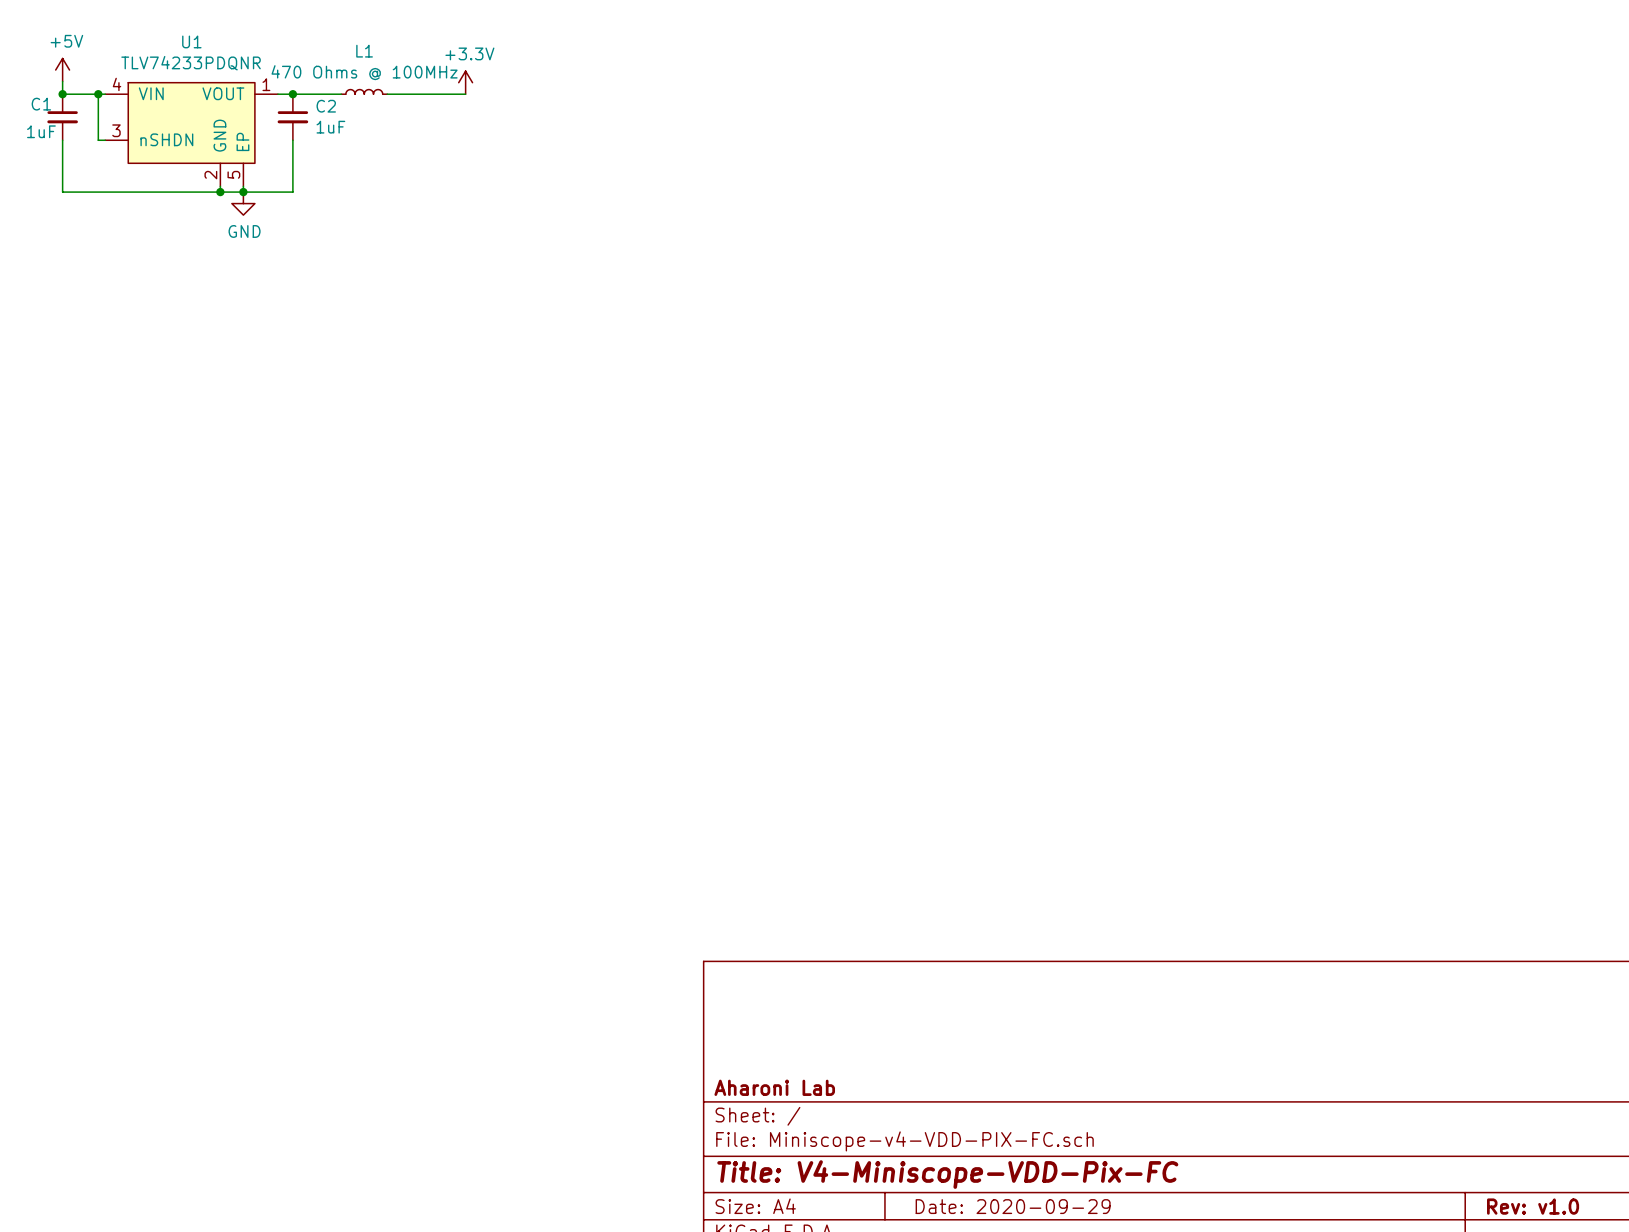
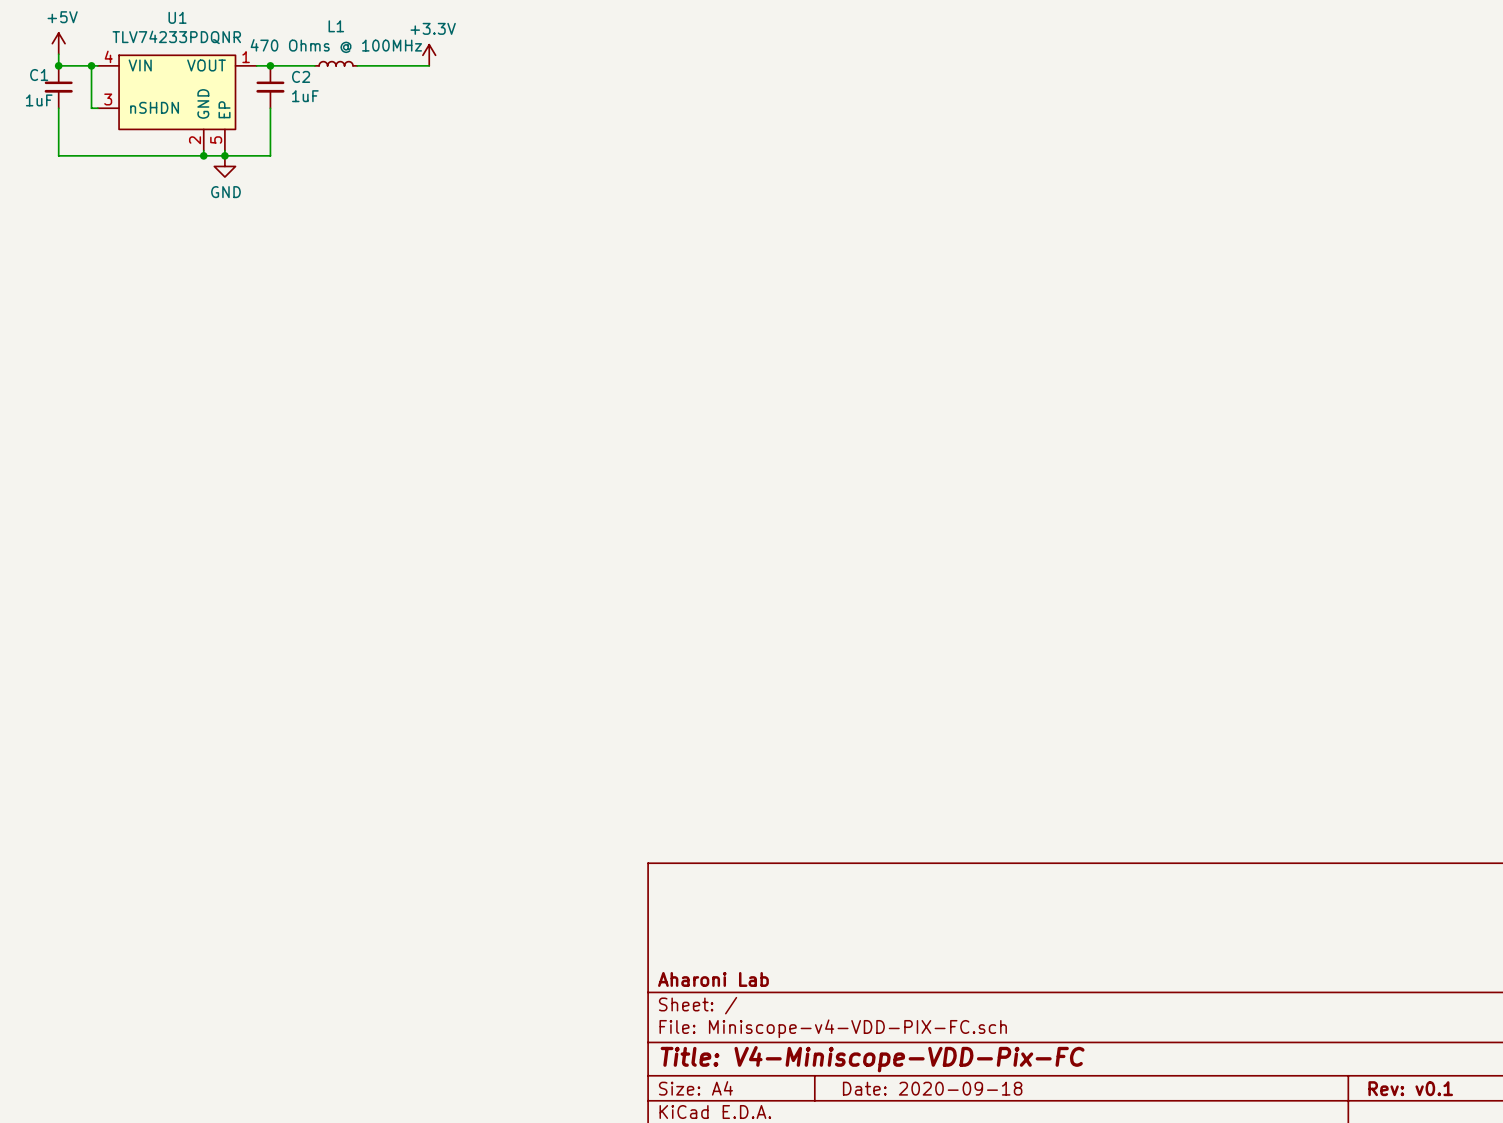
title block: Date: 2020-09-29 (1013, 1206) -> Date: 2020-09-18 (932, 1088)
title block: Rev: v1.0 (1533, 1206) -> Rev: v0.1 (1410, 1088)

